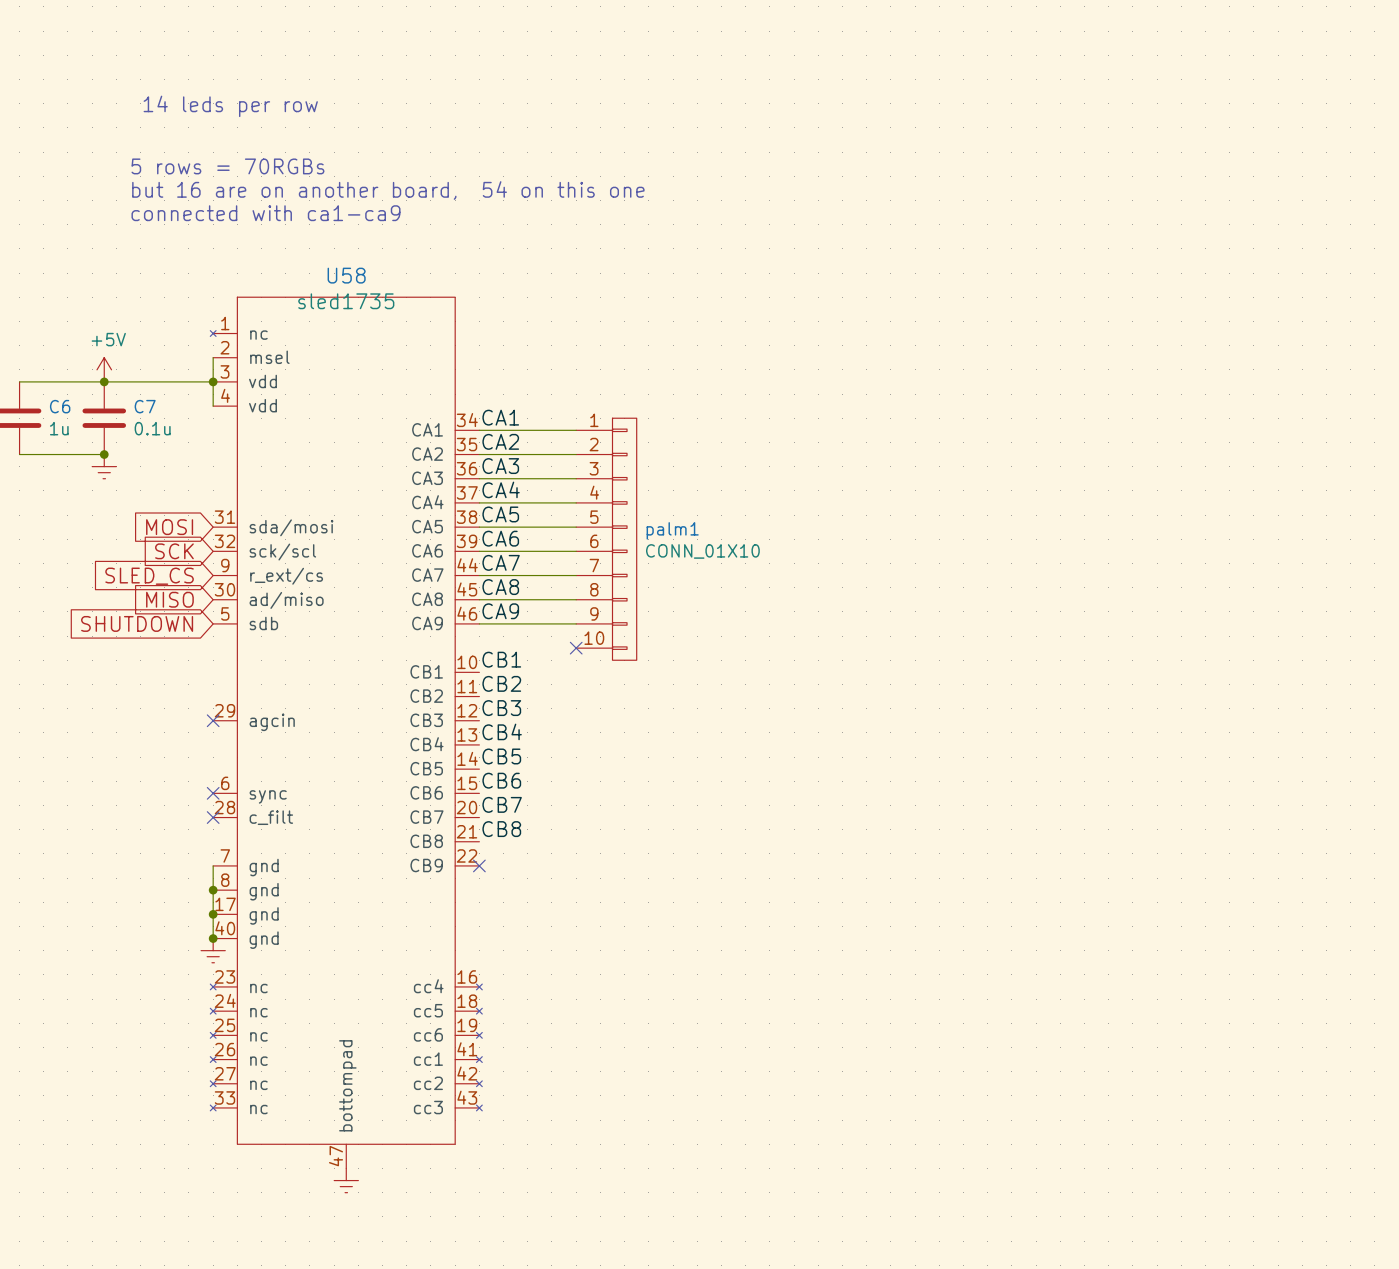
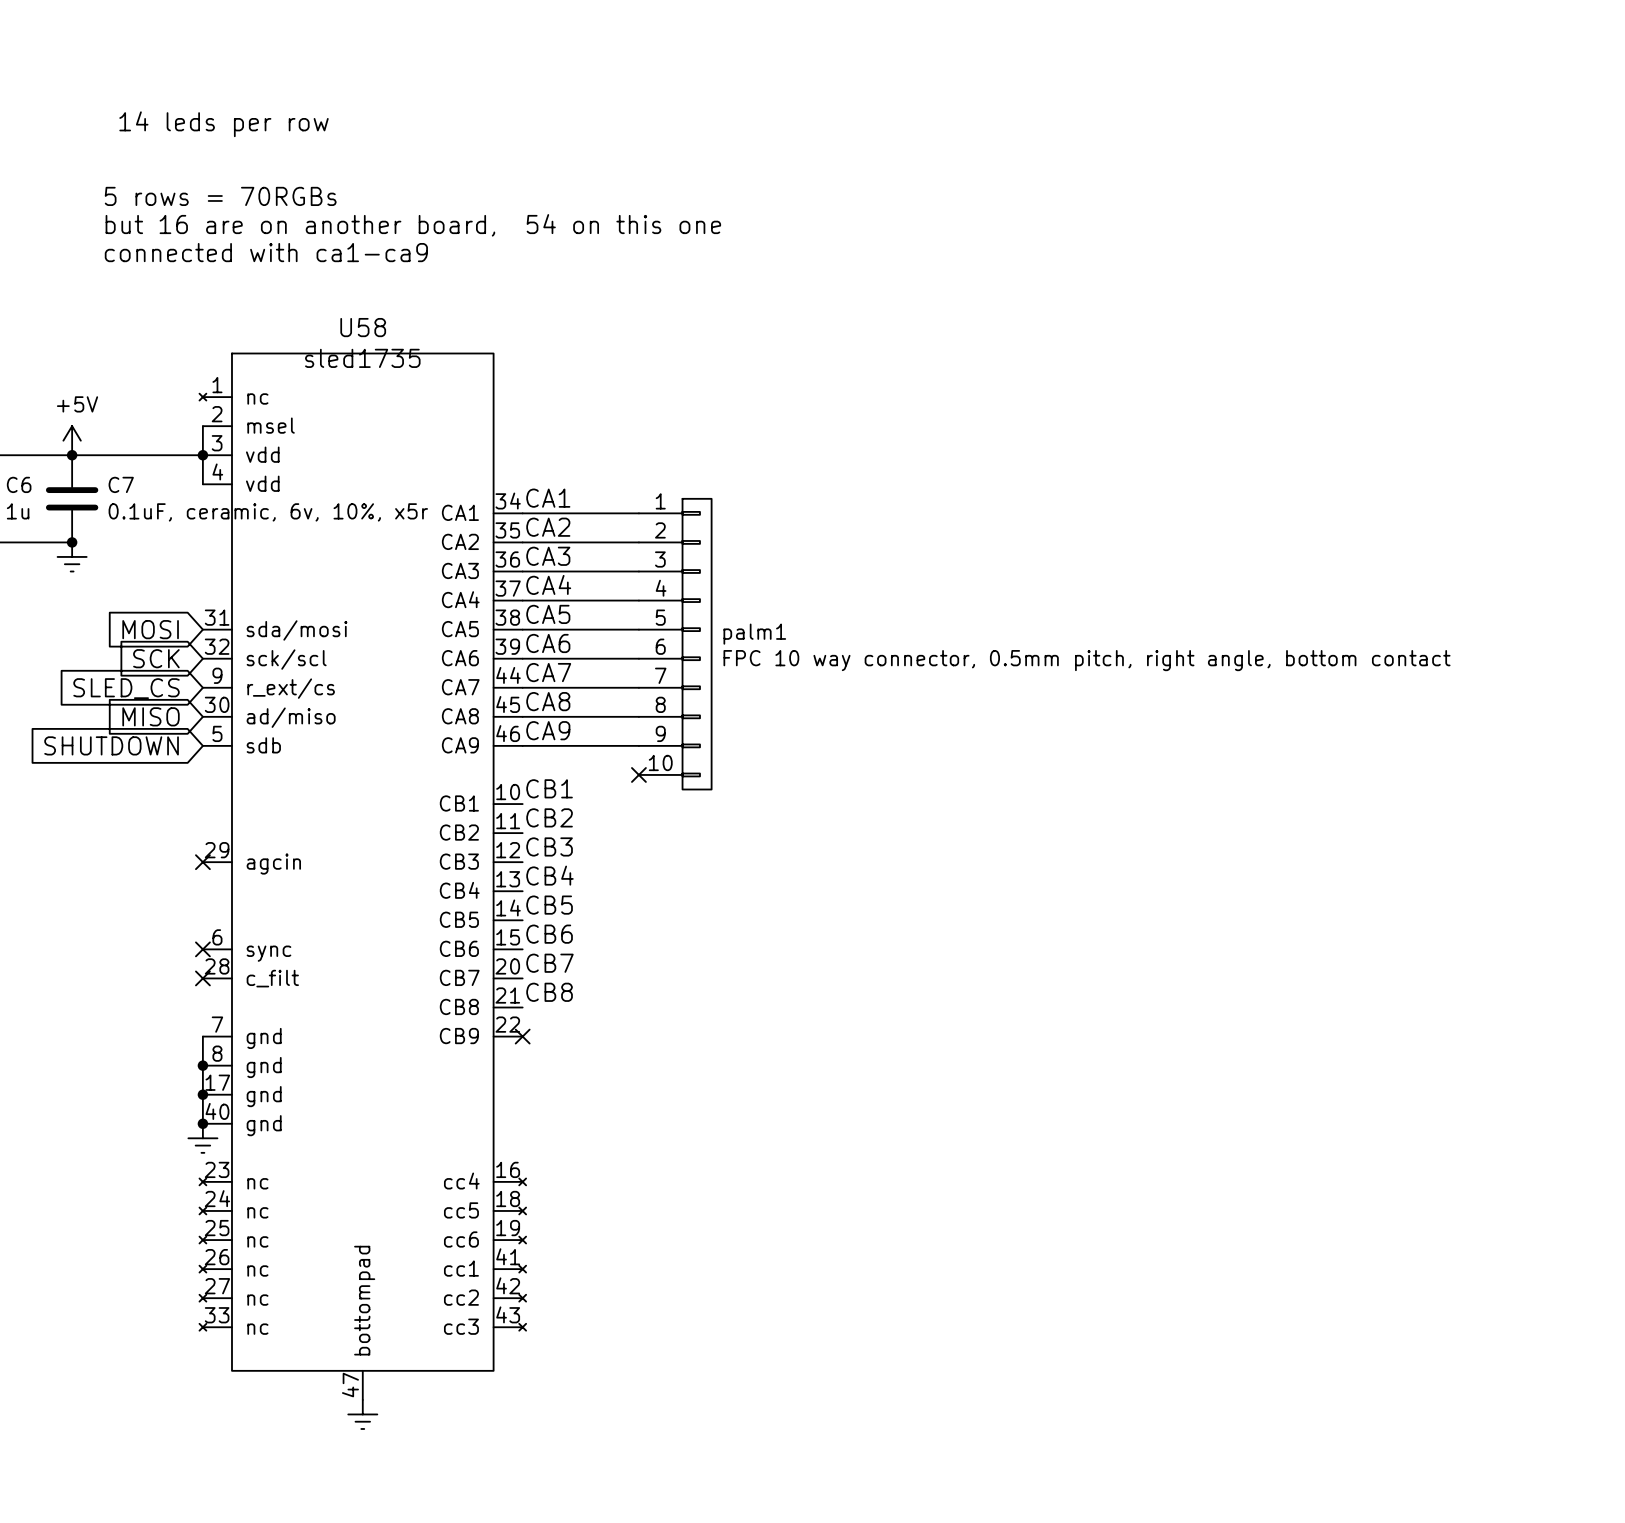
C7 value: 0.1u (152, 428) -> 0.1uF, ceramic, 6v, 10%, x5r (268, 512)
palm1 value: CONN_01X10 (702, 551) -> FPC 10 way connector, 0.5mm pitch, right angle, bottom contact (1086, 660)

